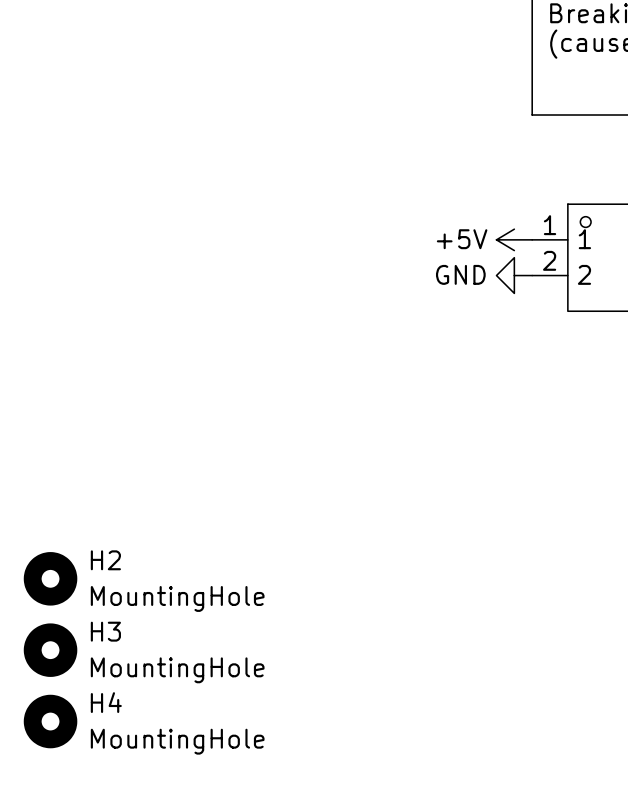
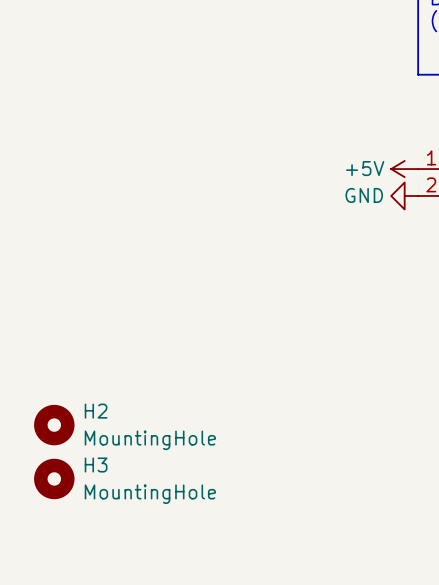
H4: MountingHole (50, 721) -> none

